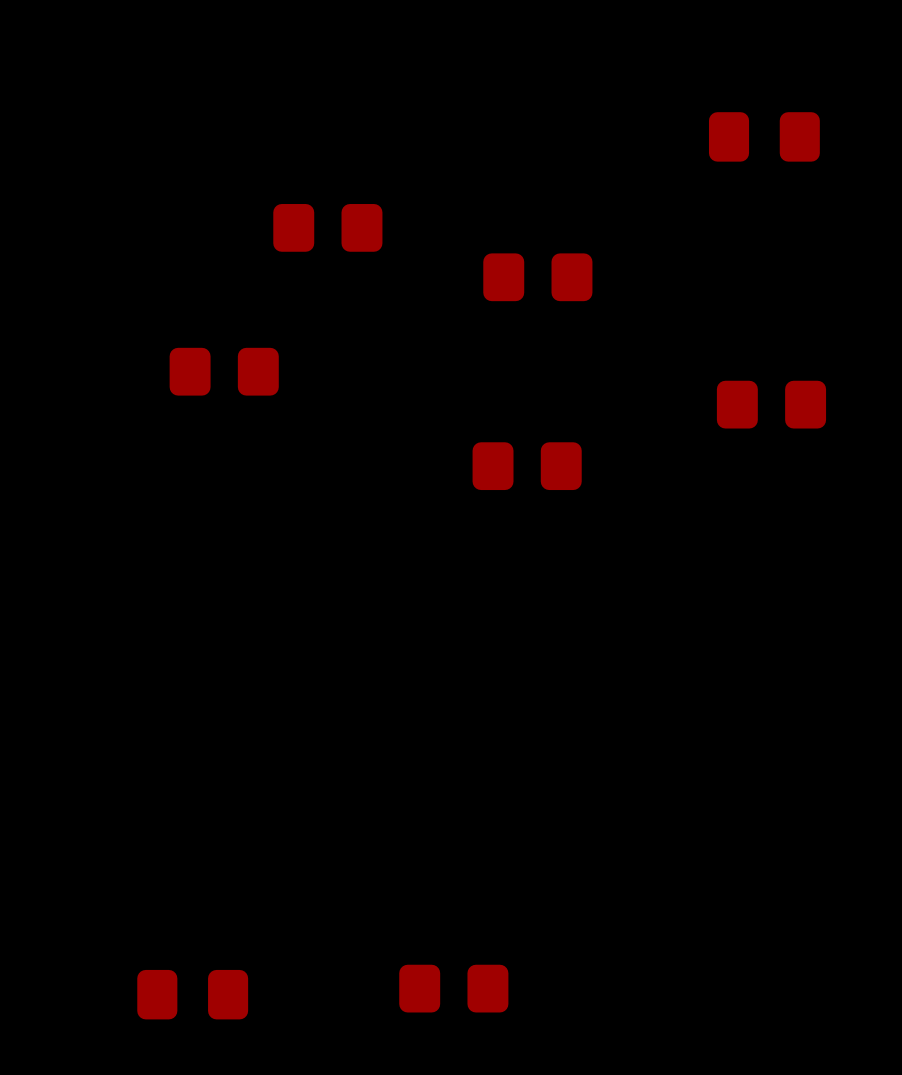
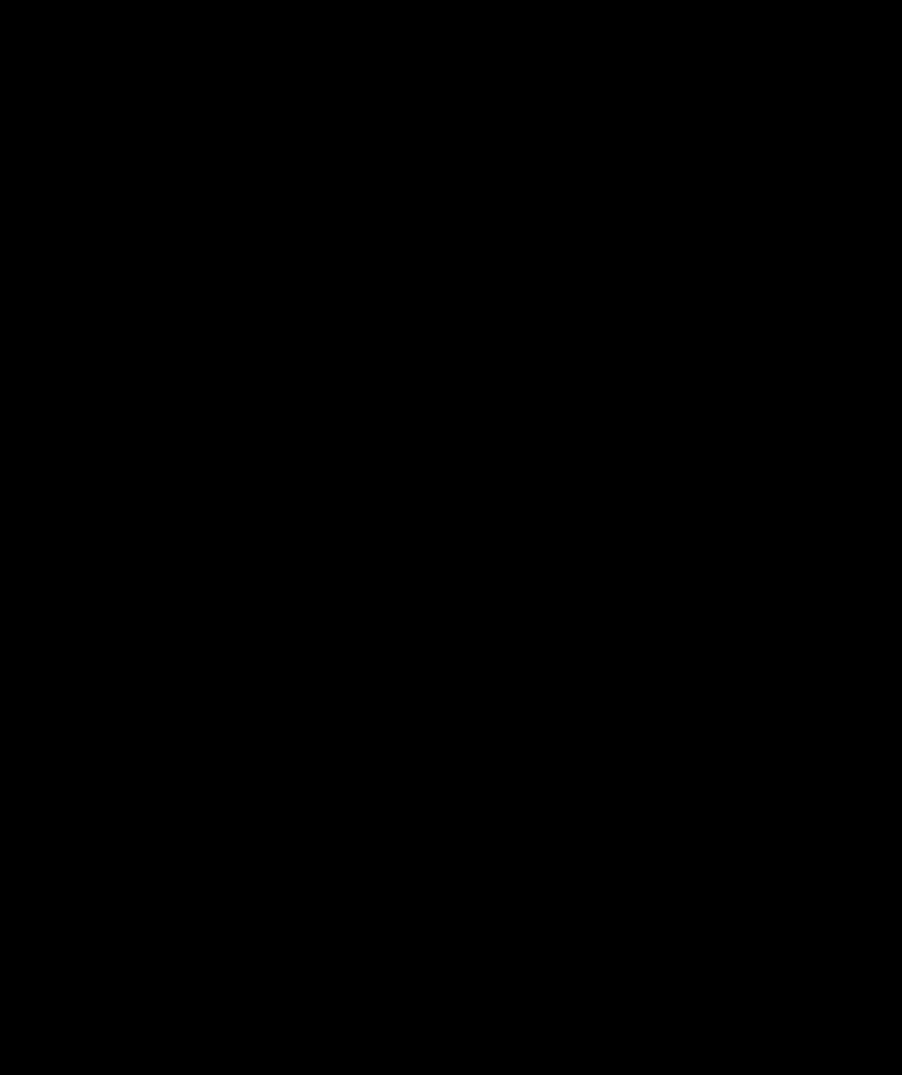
part: (764, 136) -> none
part: (327, 227) -> none
part: (537, 277) -> none
part: (224, 371) -> none
part: (771, 404) -> none
part: (527, 466) -> none
part: (453, 988) -> none
part: (192, 994) -> none

